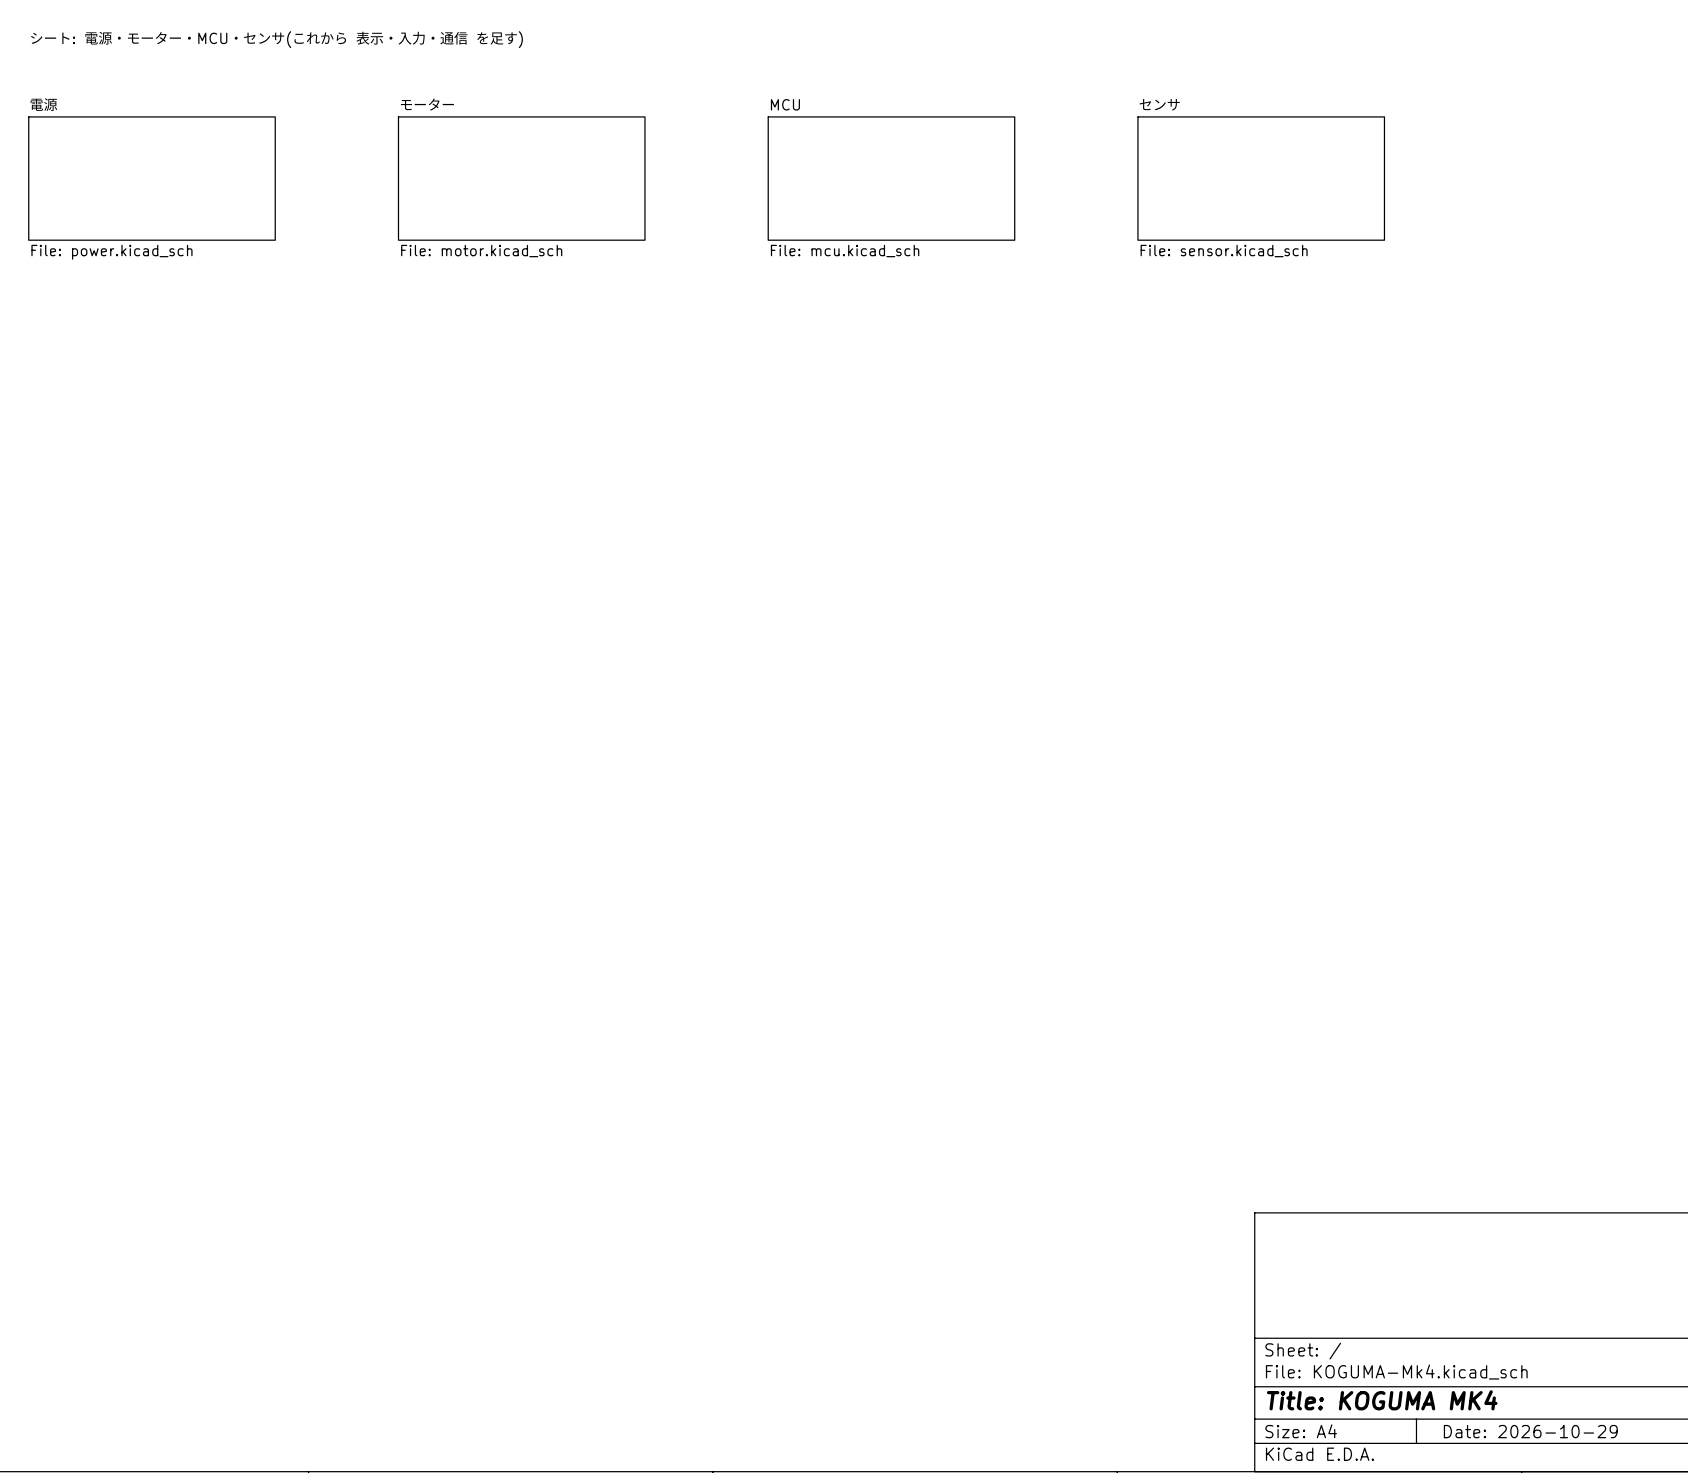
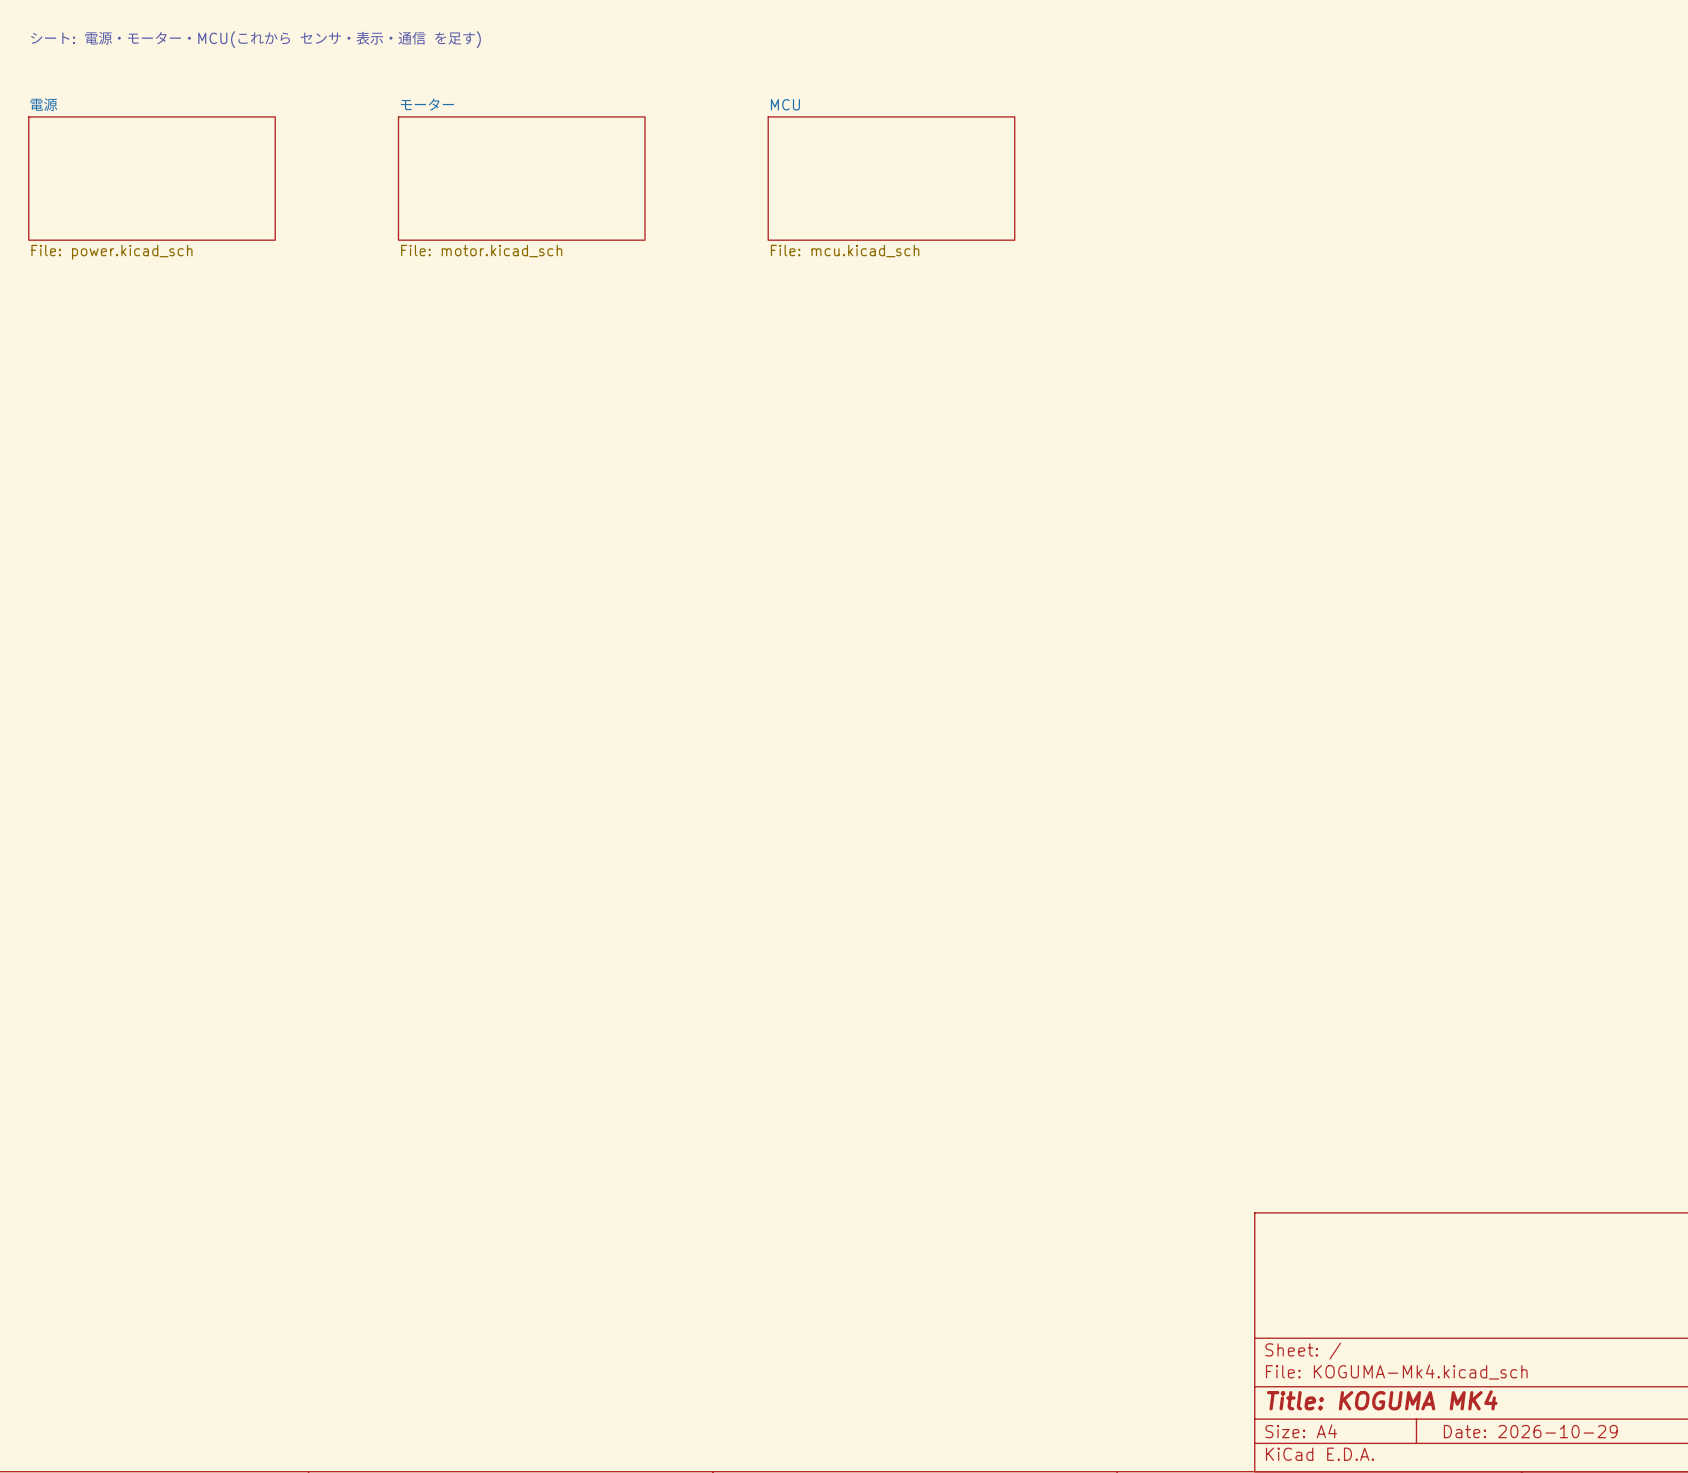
text: シート: 電源・モーター・MCU・センサ(これから 表示・入力・通信 を足す) (276, 39) -> シート: 電源・モーター・MCU(これから センサ・表示・通信 を足す) (255, 39)
sheet センサ: File: sensor.kicad_sch (1261, 178) -> none

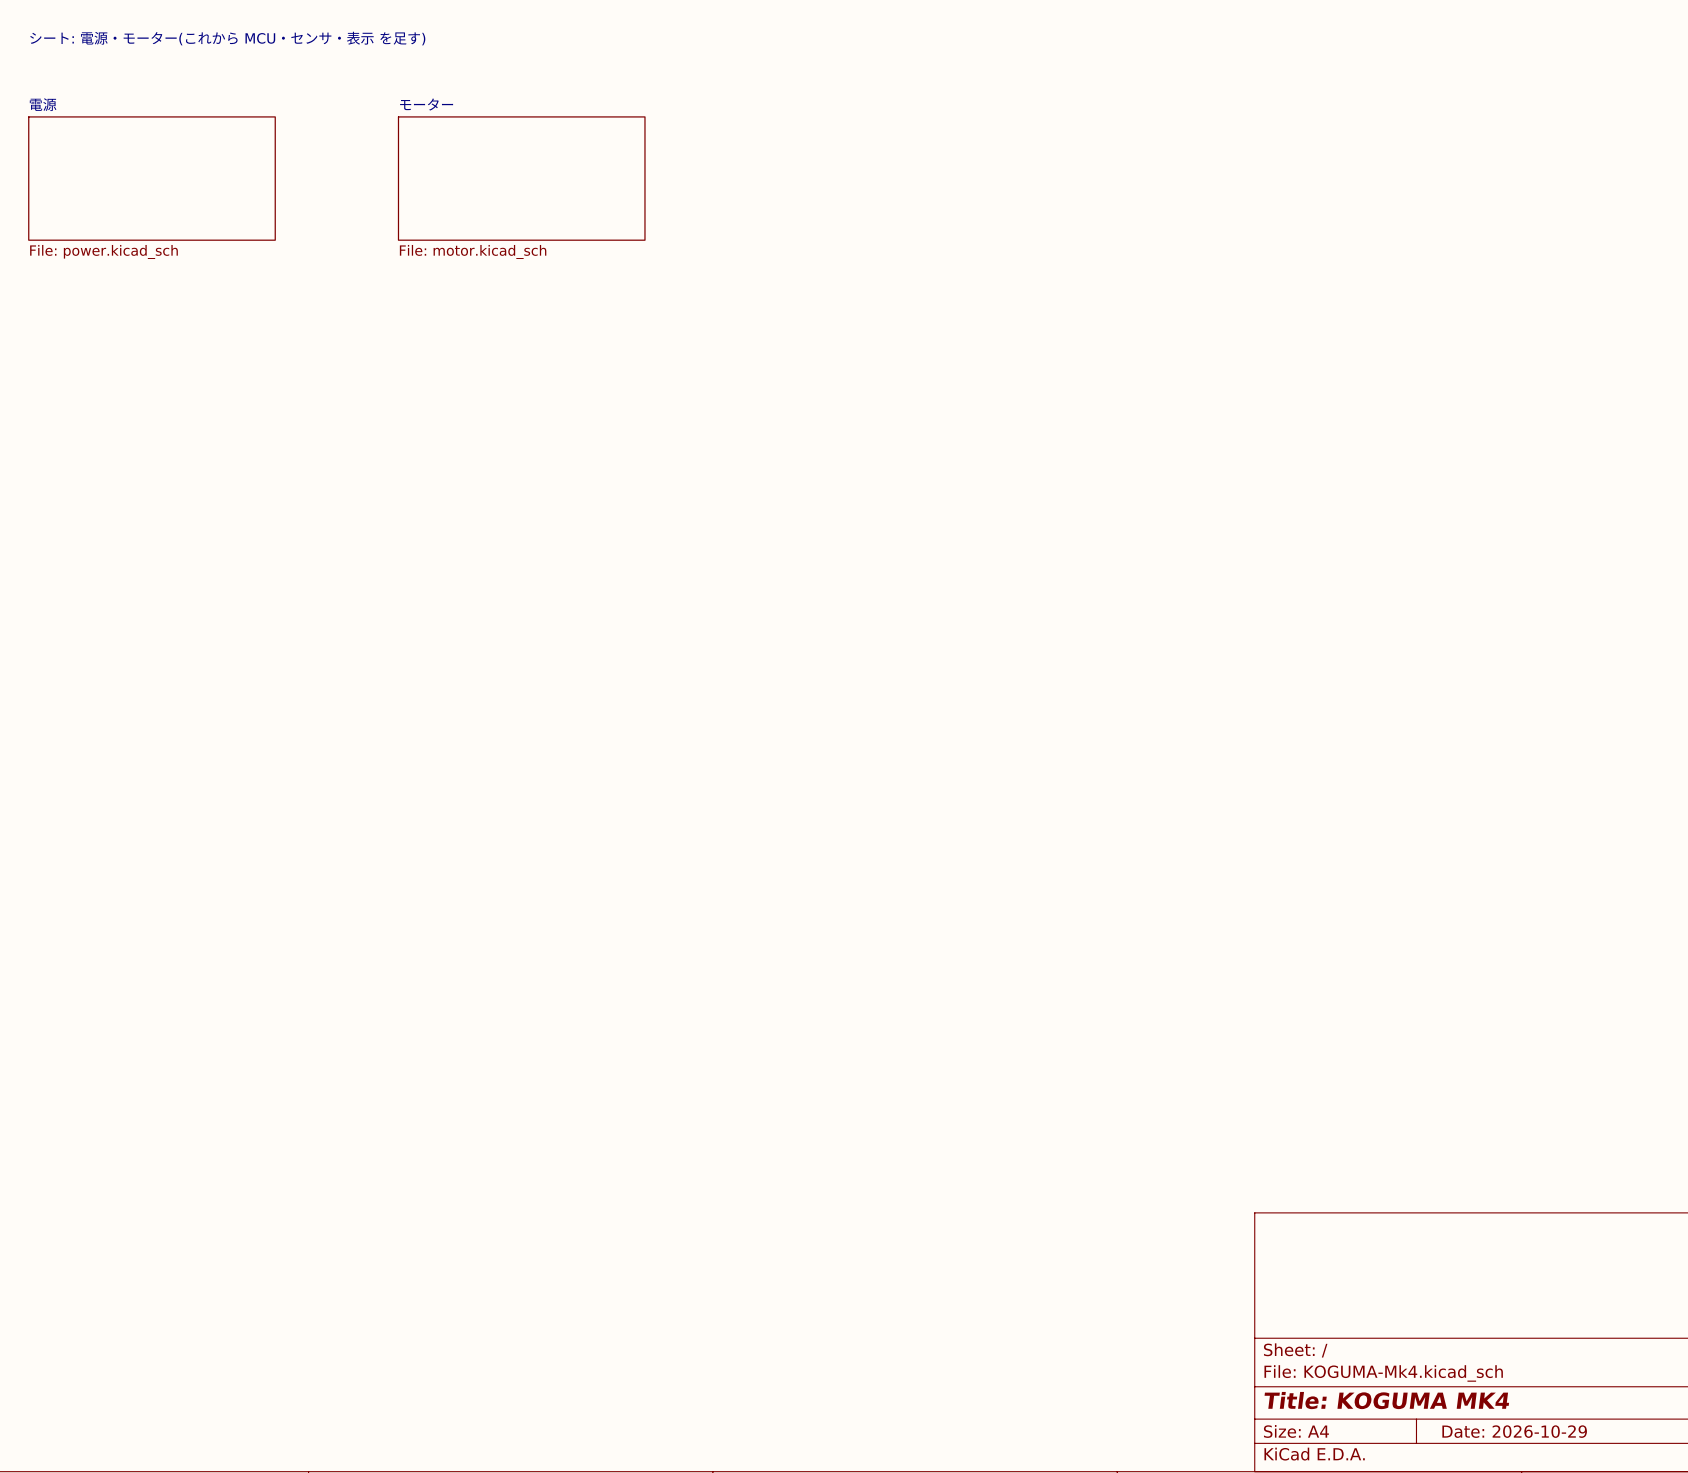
text: シート: 電源・モーター・MCU(これから センサ・表示・通信 を足す) (255, 39) -> シート: 電源・モーター(これから MCU・センサ・表示 を足す) (227, 38)
sheet MCU: File: mcu.kicad_sch (891, 178) -> none

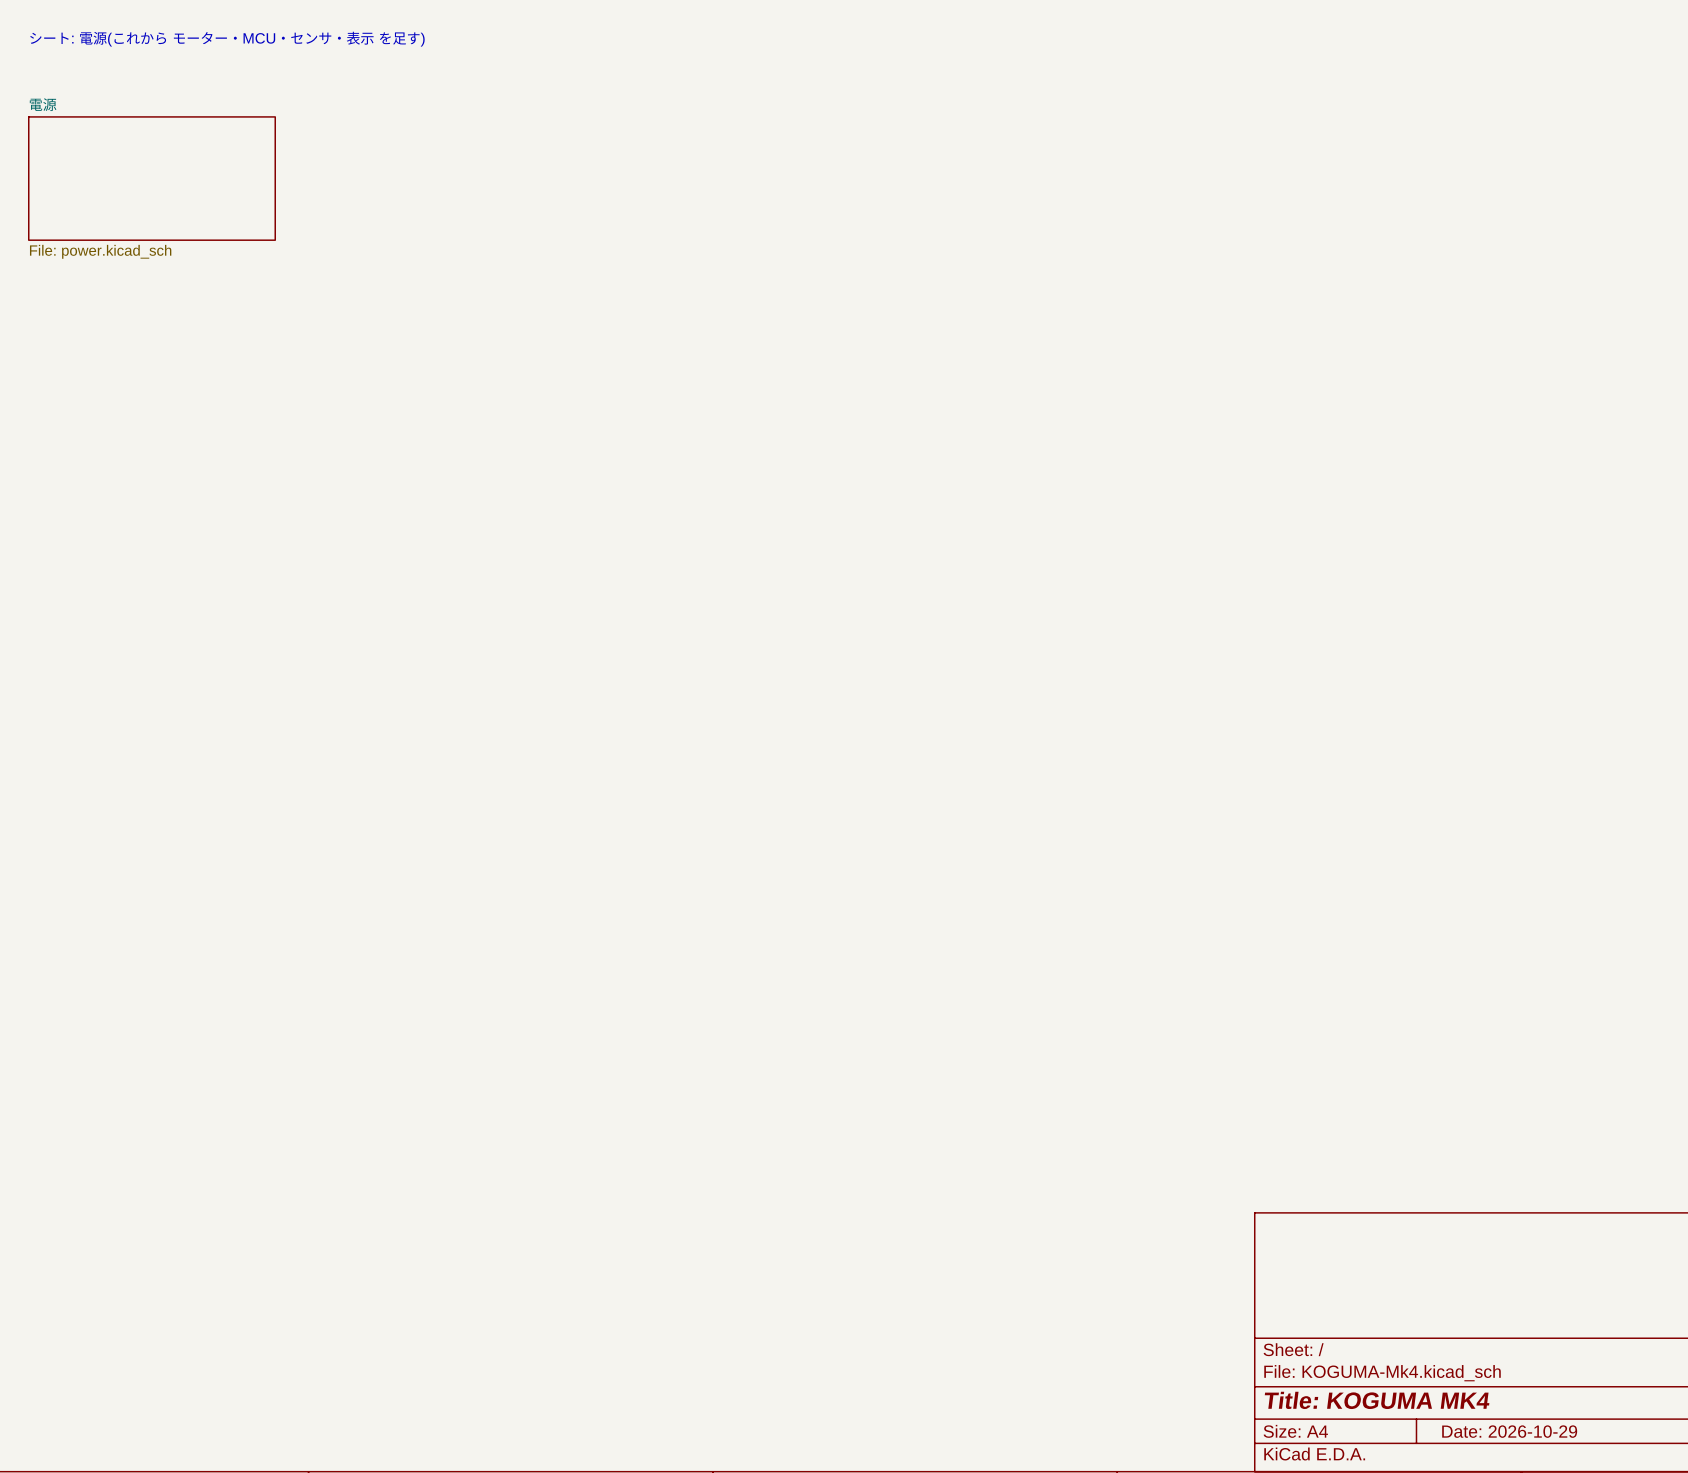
text: シート: 電源・モーター(これから MCU・センサ・表示 を足す) (227, 38) -> シート: 電源(これから モーター・MCU・センサ・表示 を足す) (227, 39)
sheet モーター: File: motor.kicad_sch (521, 178) -> none

